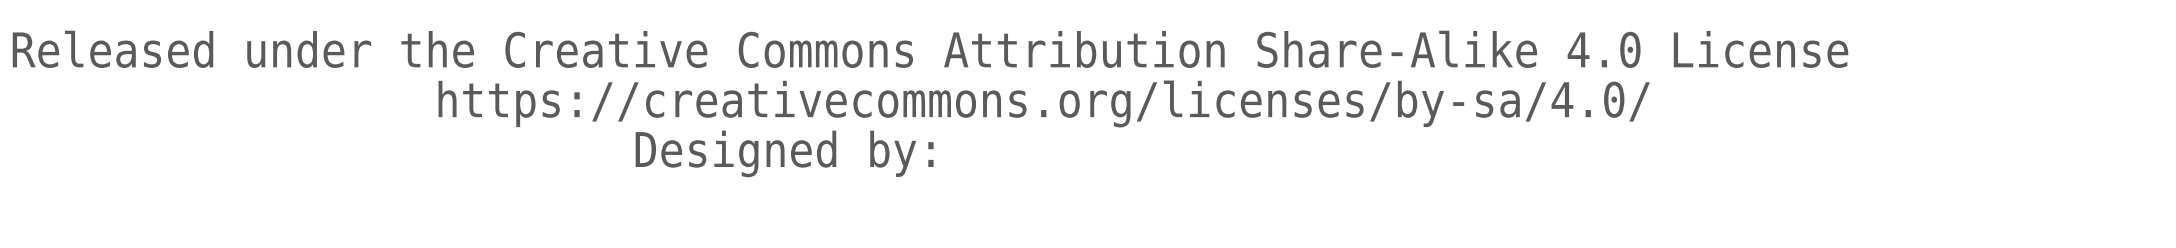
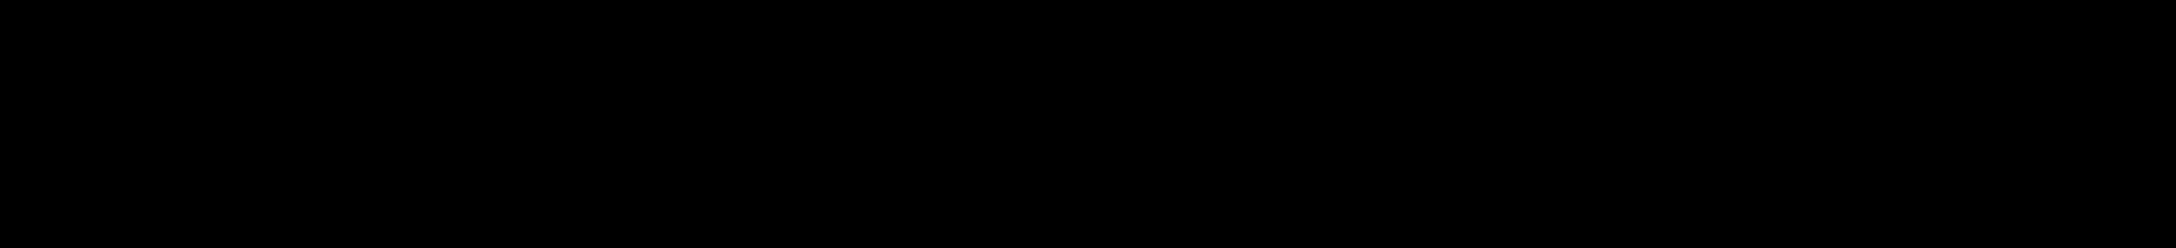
drawing: [12, 30, 1849, 178] -> none

